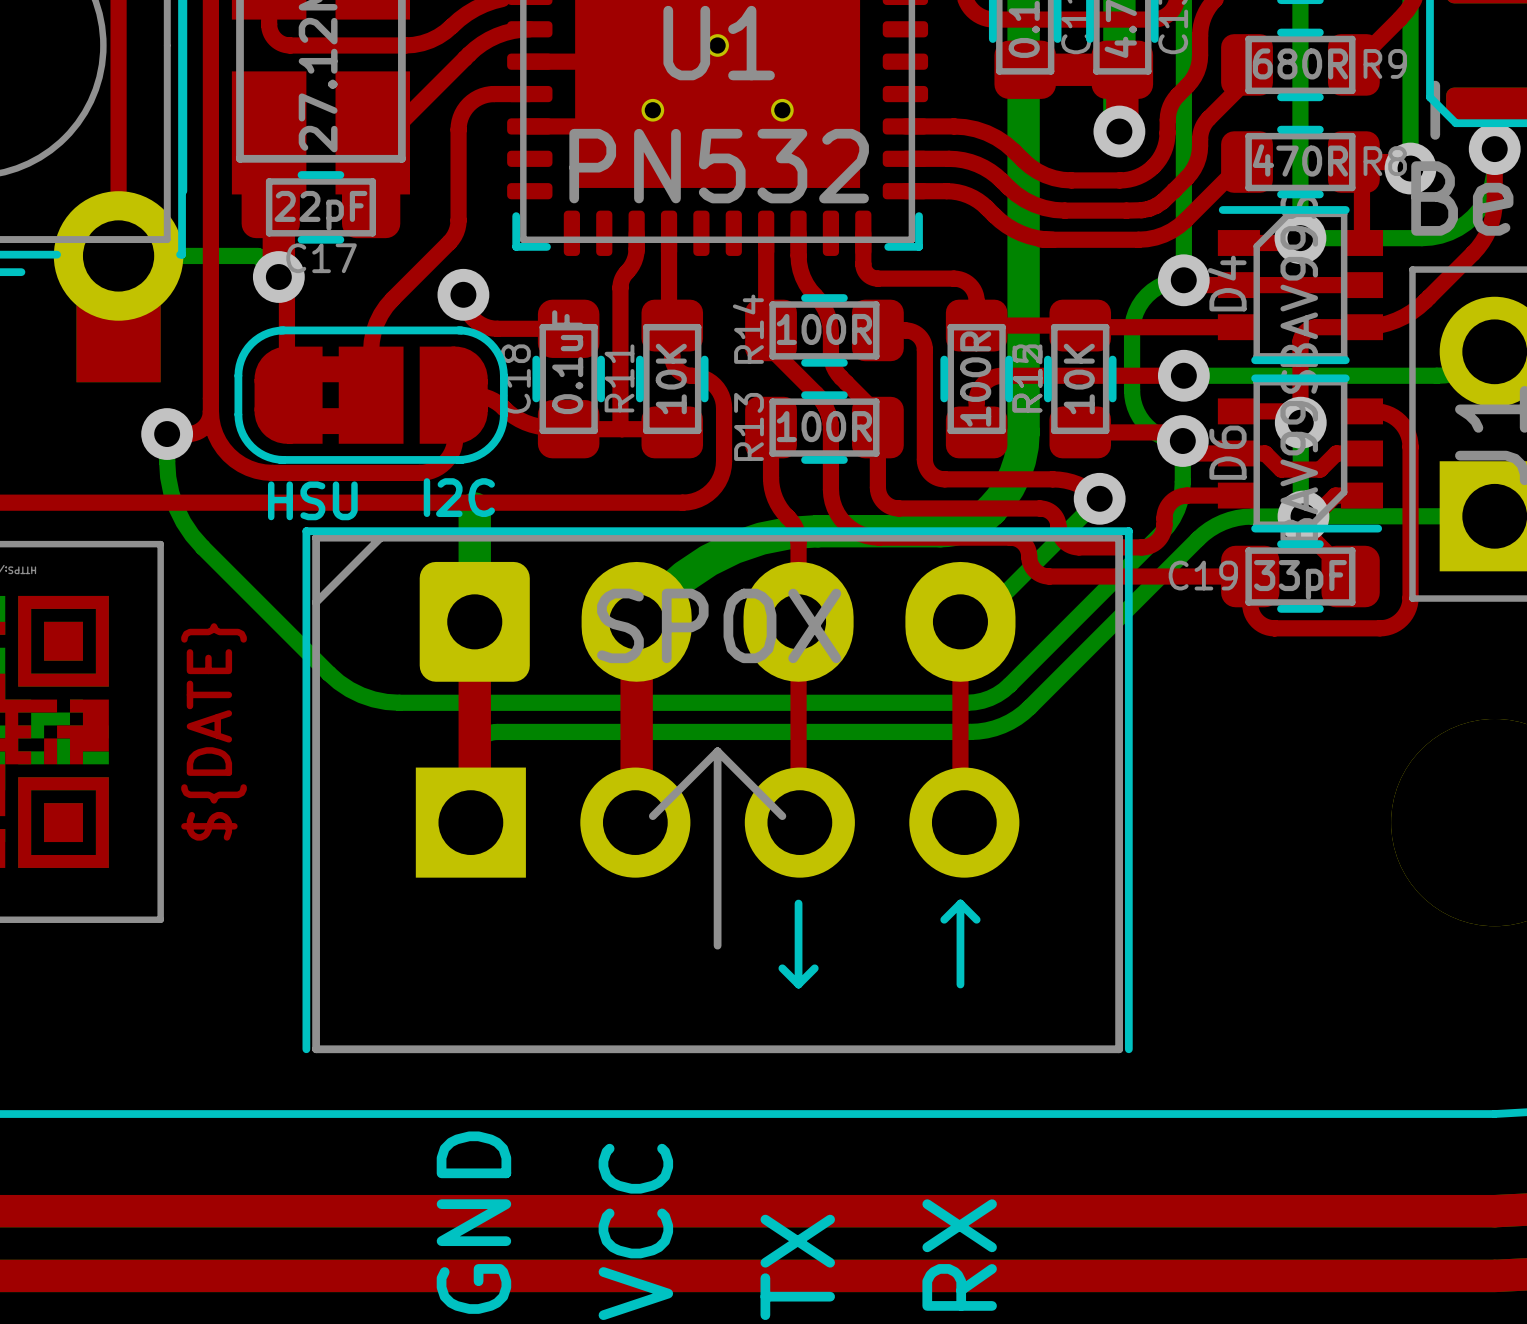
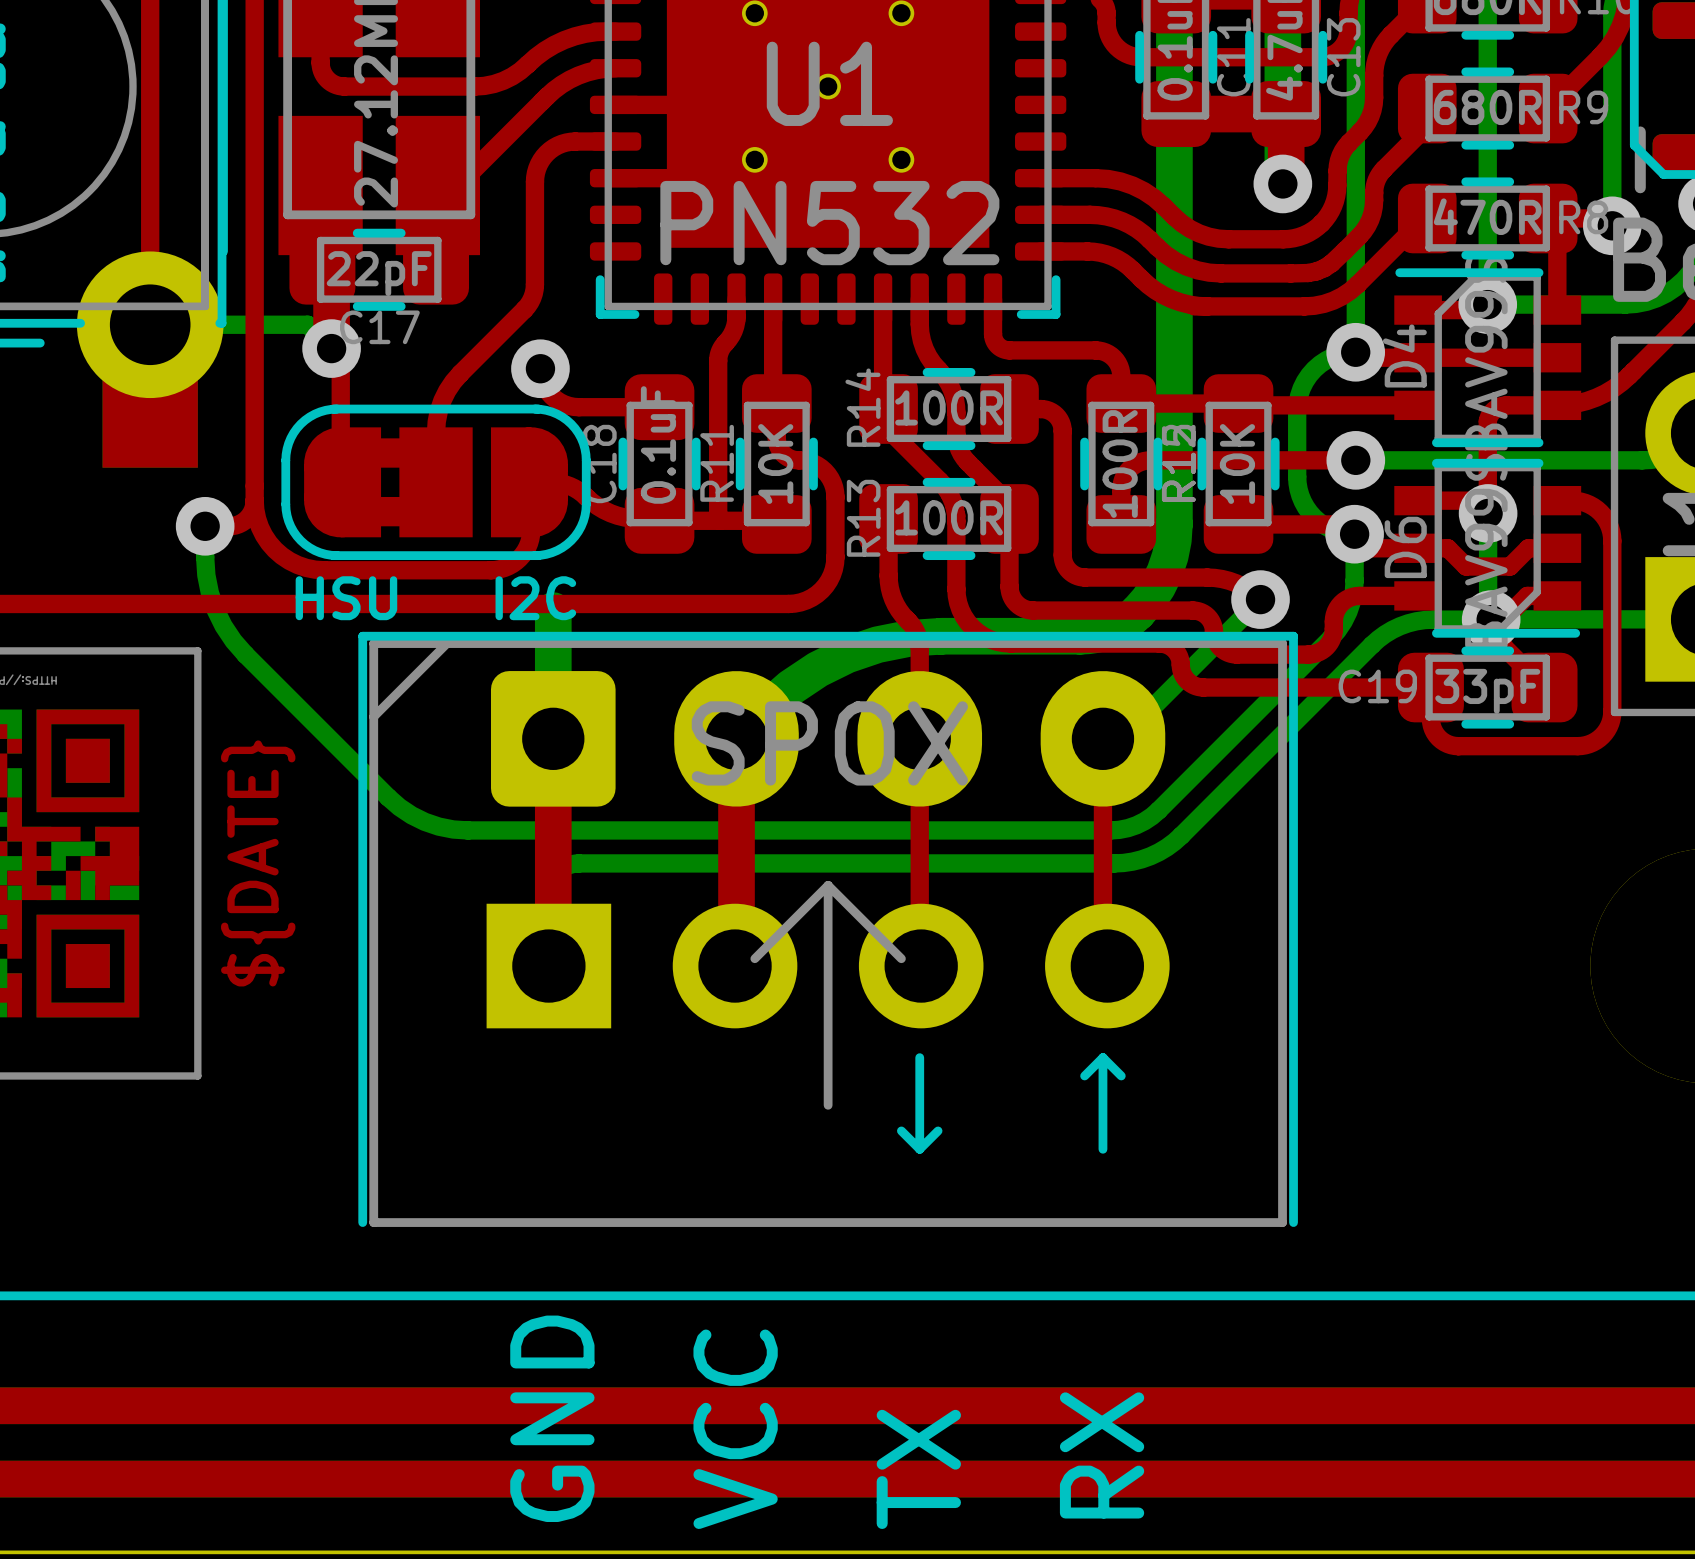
text position: HSU (312, 500) -> HSU (346, 598)

